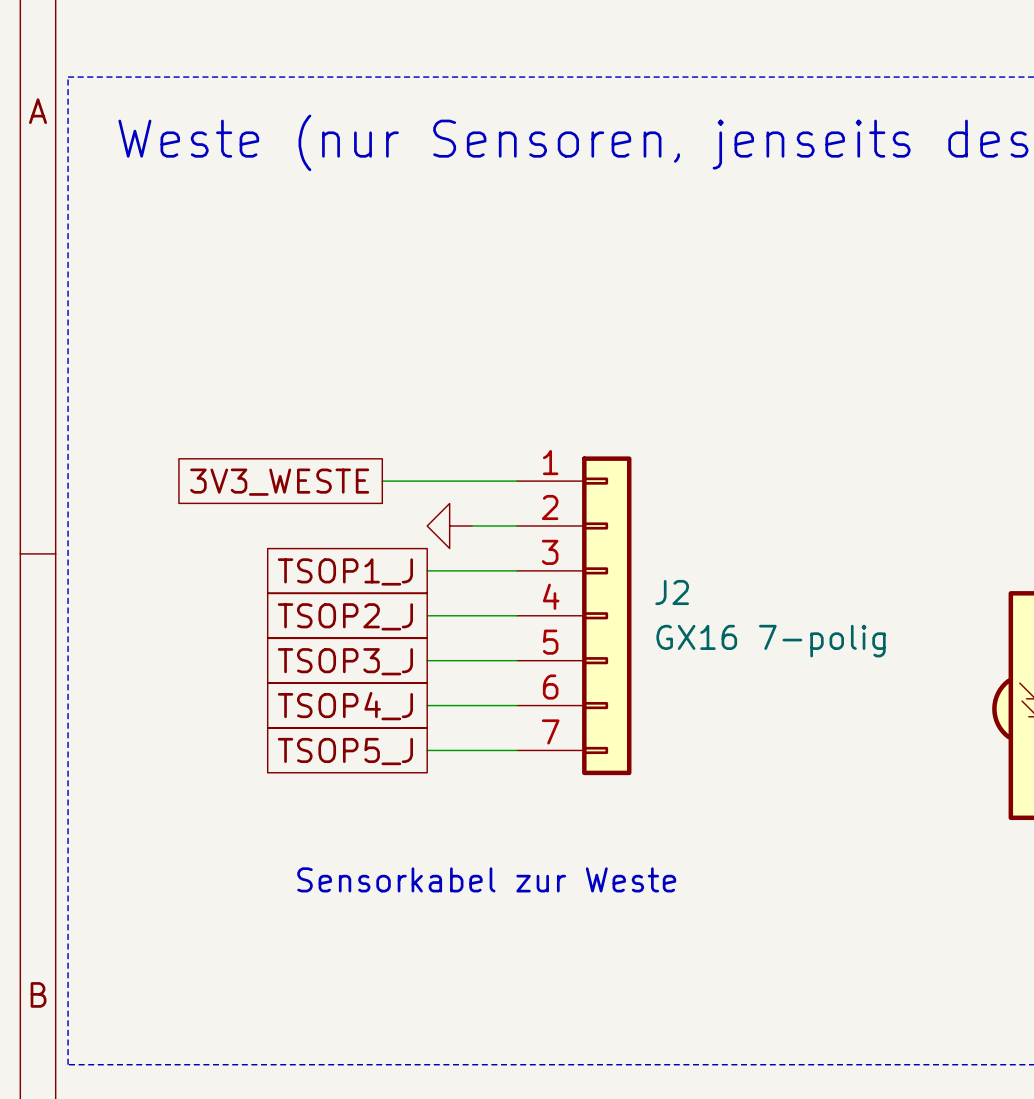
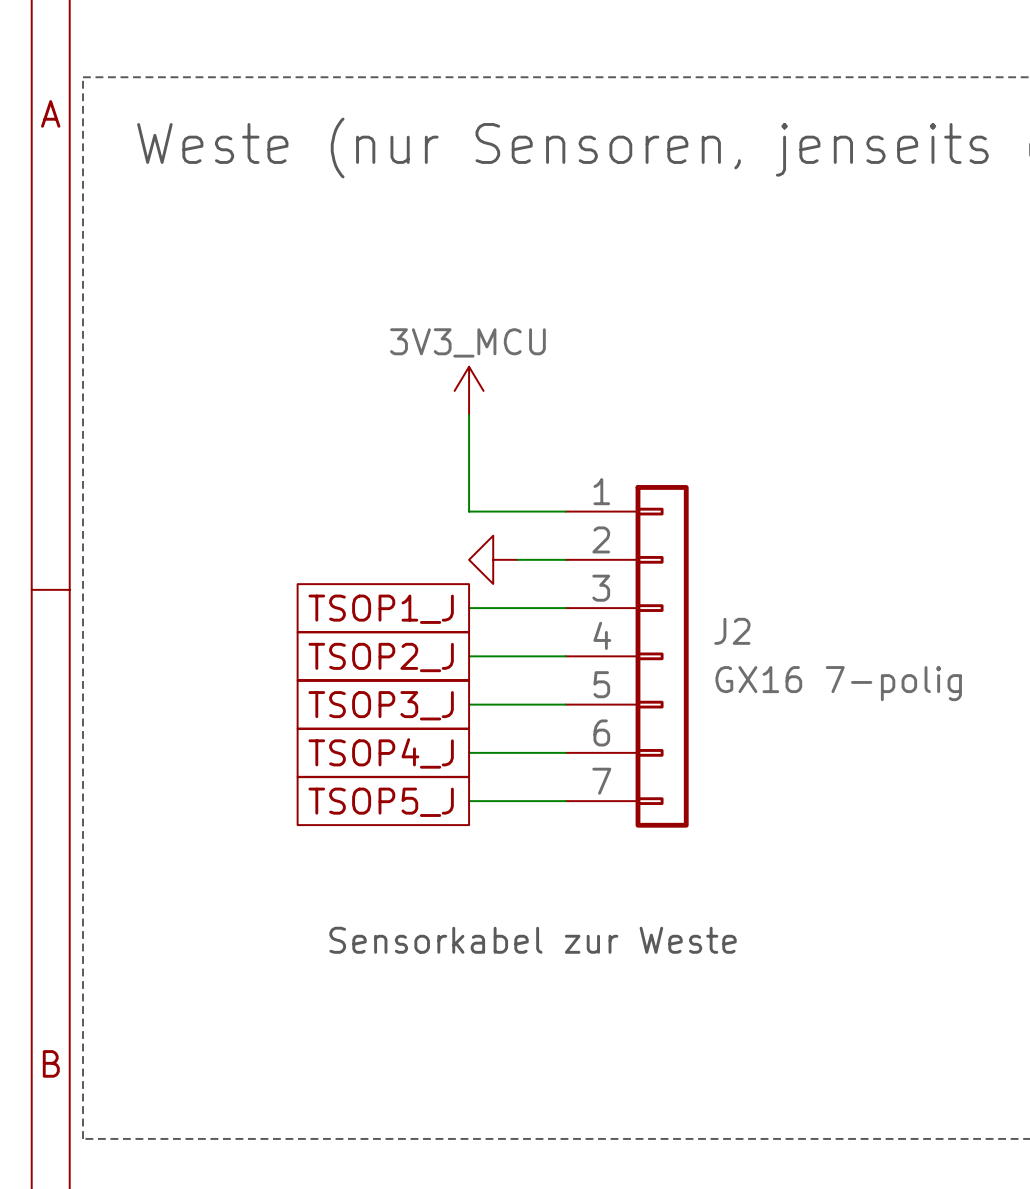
power symbol: none -> 3V3_MCU (469, 390)
wire: (382, 481) (427, 481) -> (469, 415) (469, 511)
global label: 3V3_WESTE (279, 482) -> none

